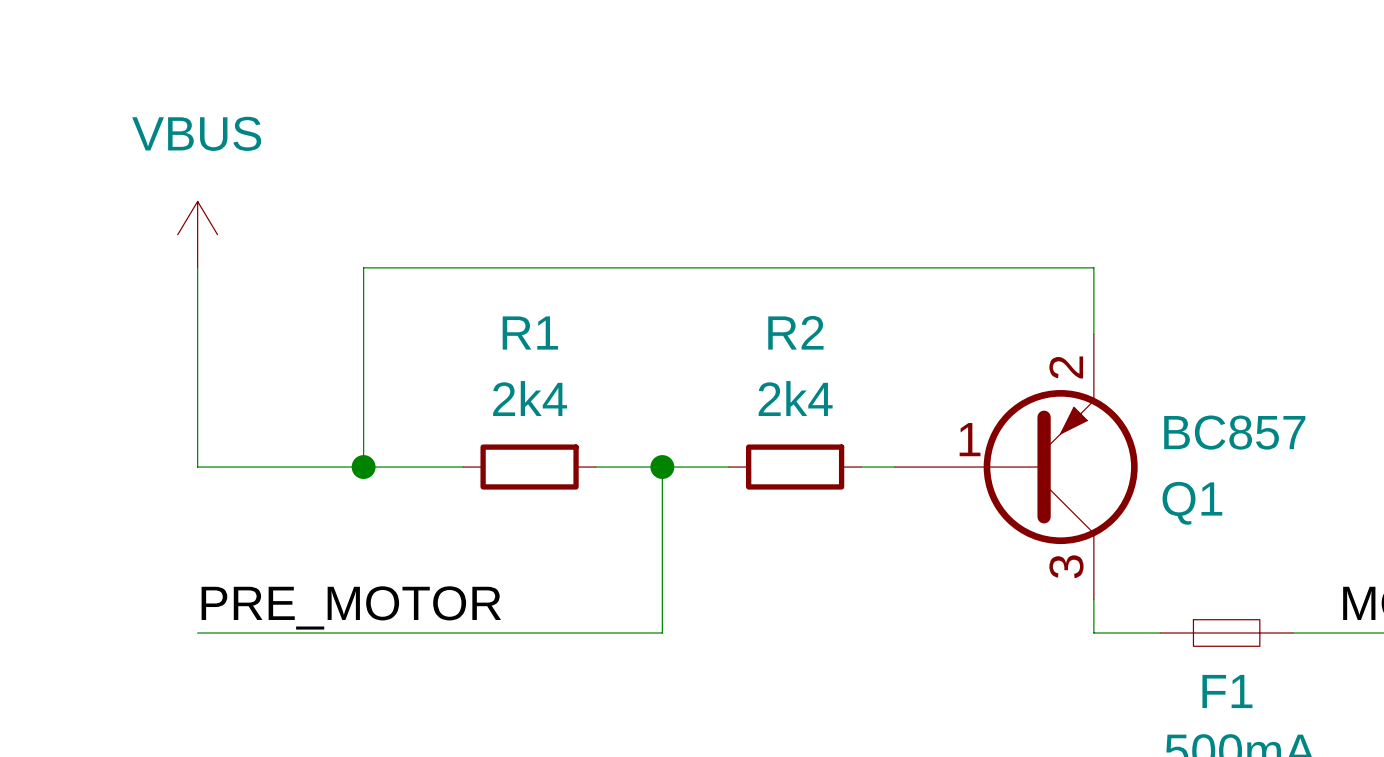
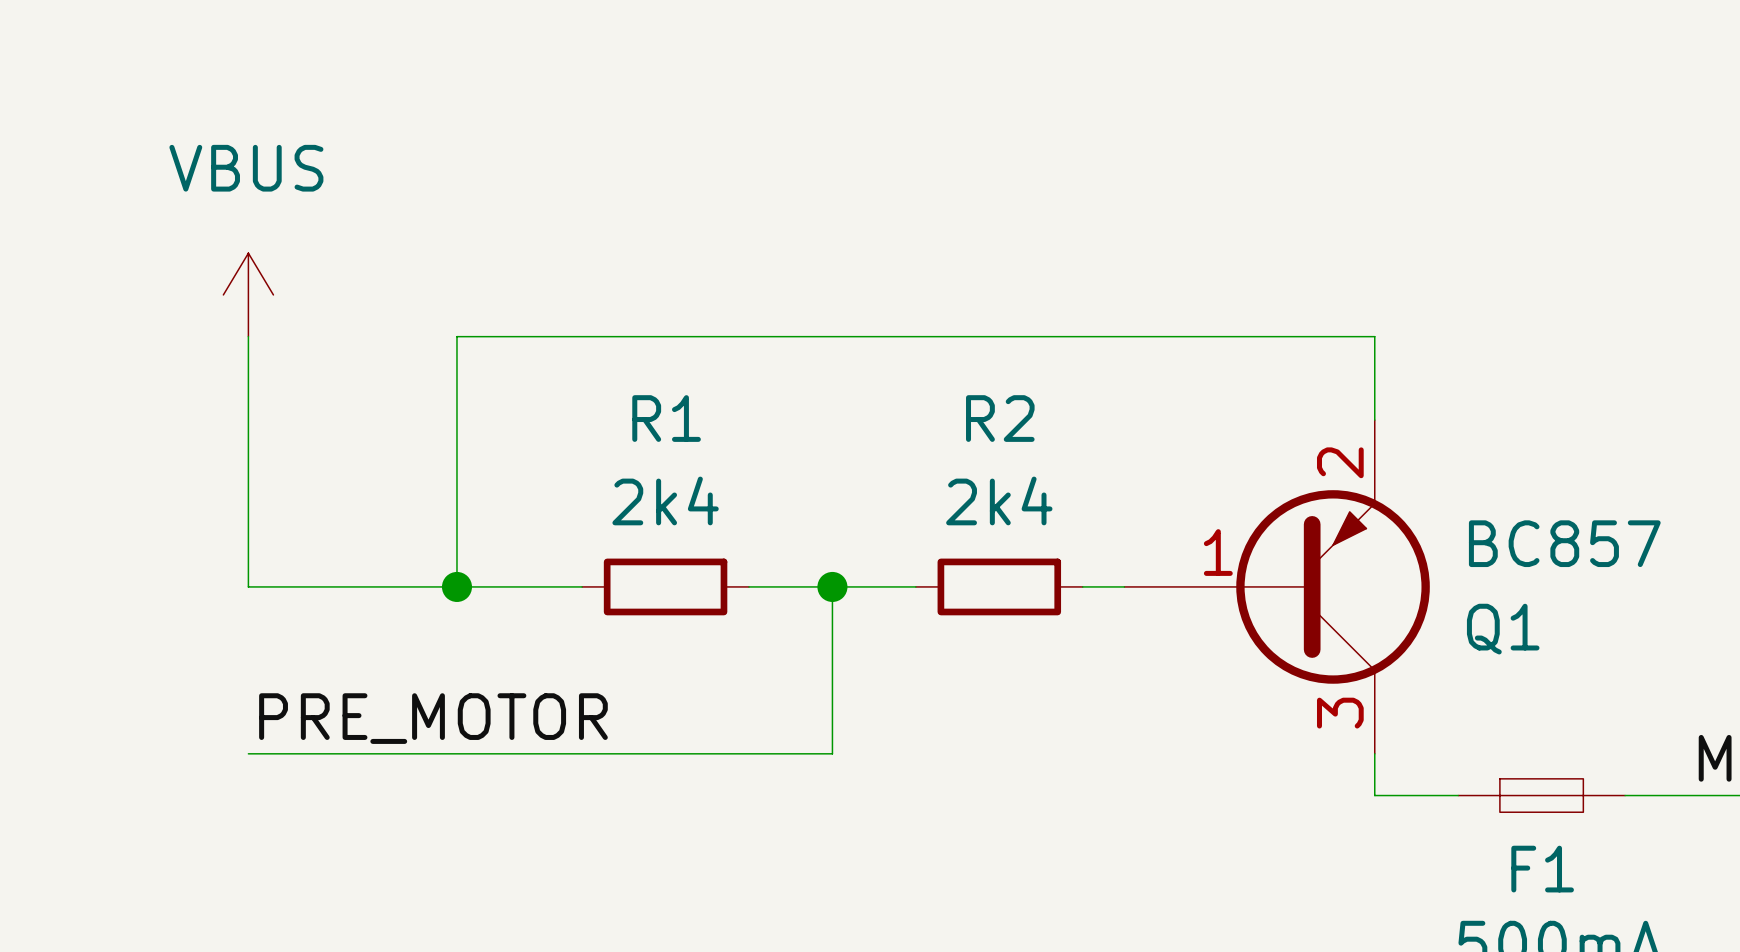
wire: (662, 599) (662, 632) (197, 632) -> (832, 753) (248, 753)
label position: PRE_MOTOR (351, 607) -> PRE_MOTOR (433, 718)

